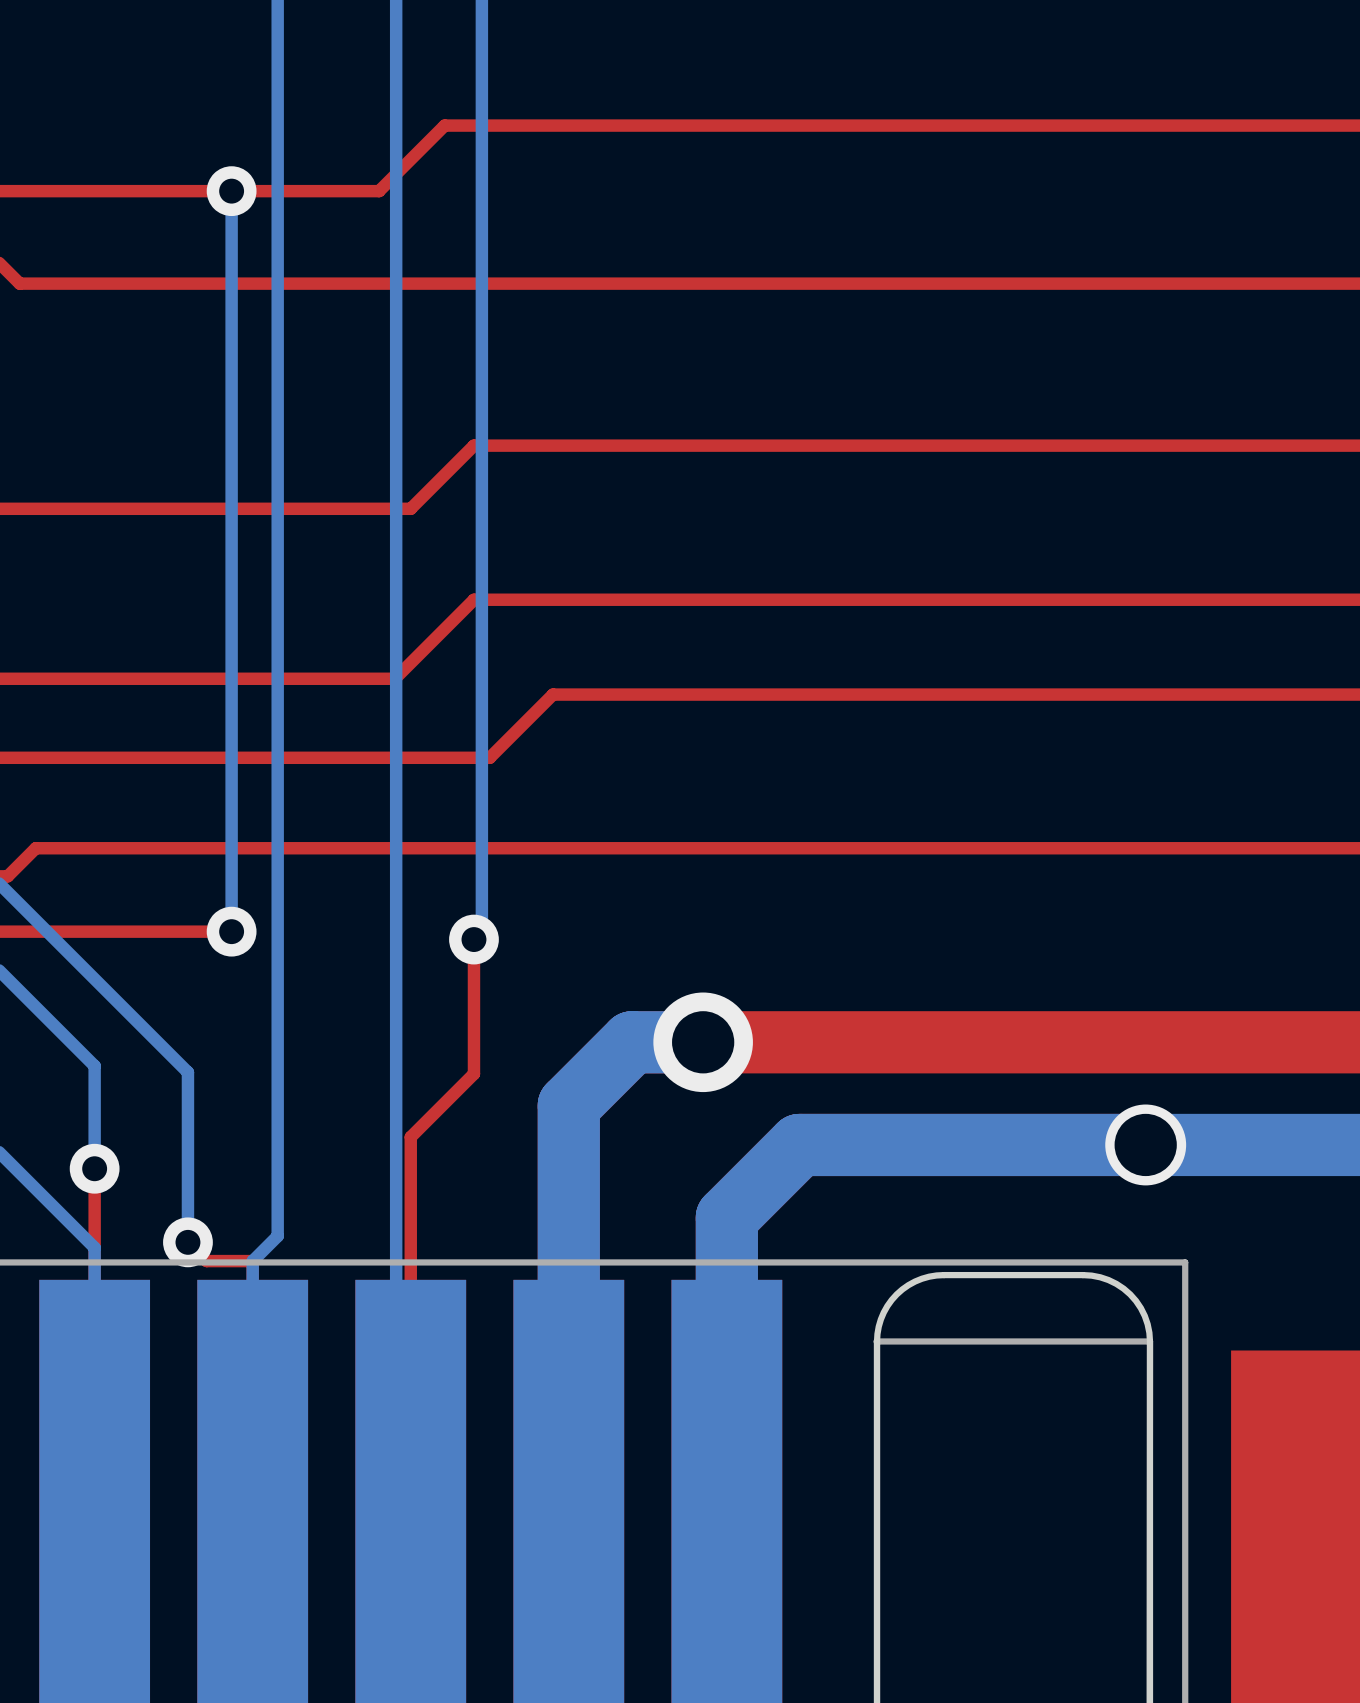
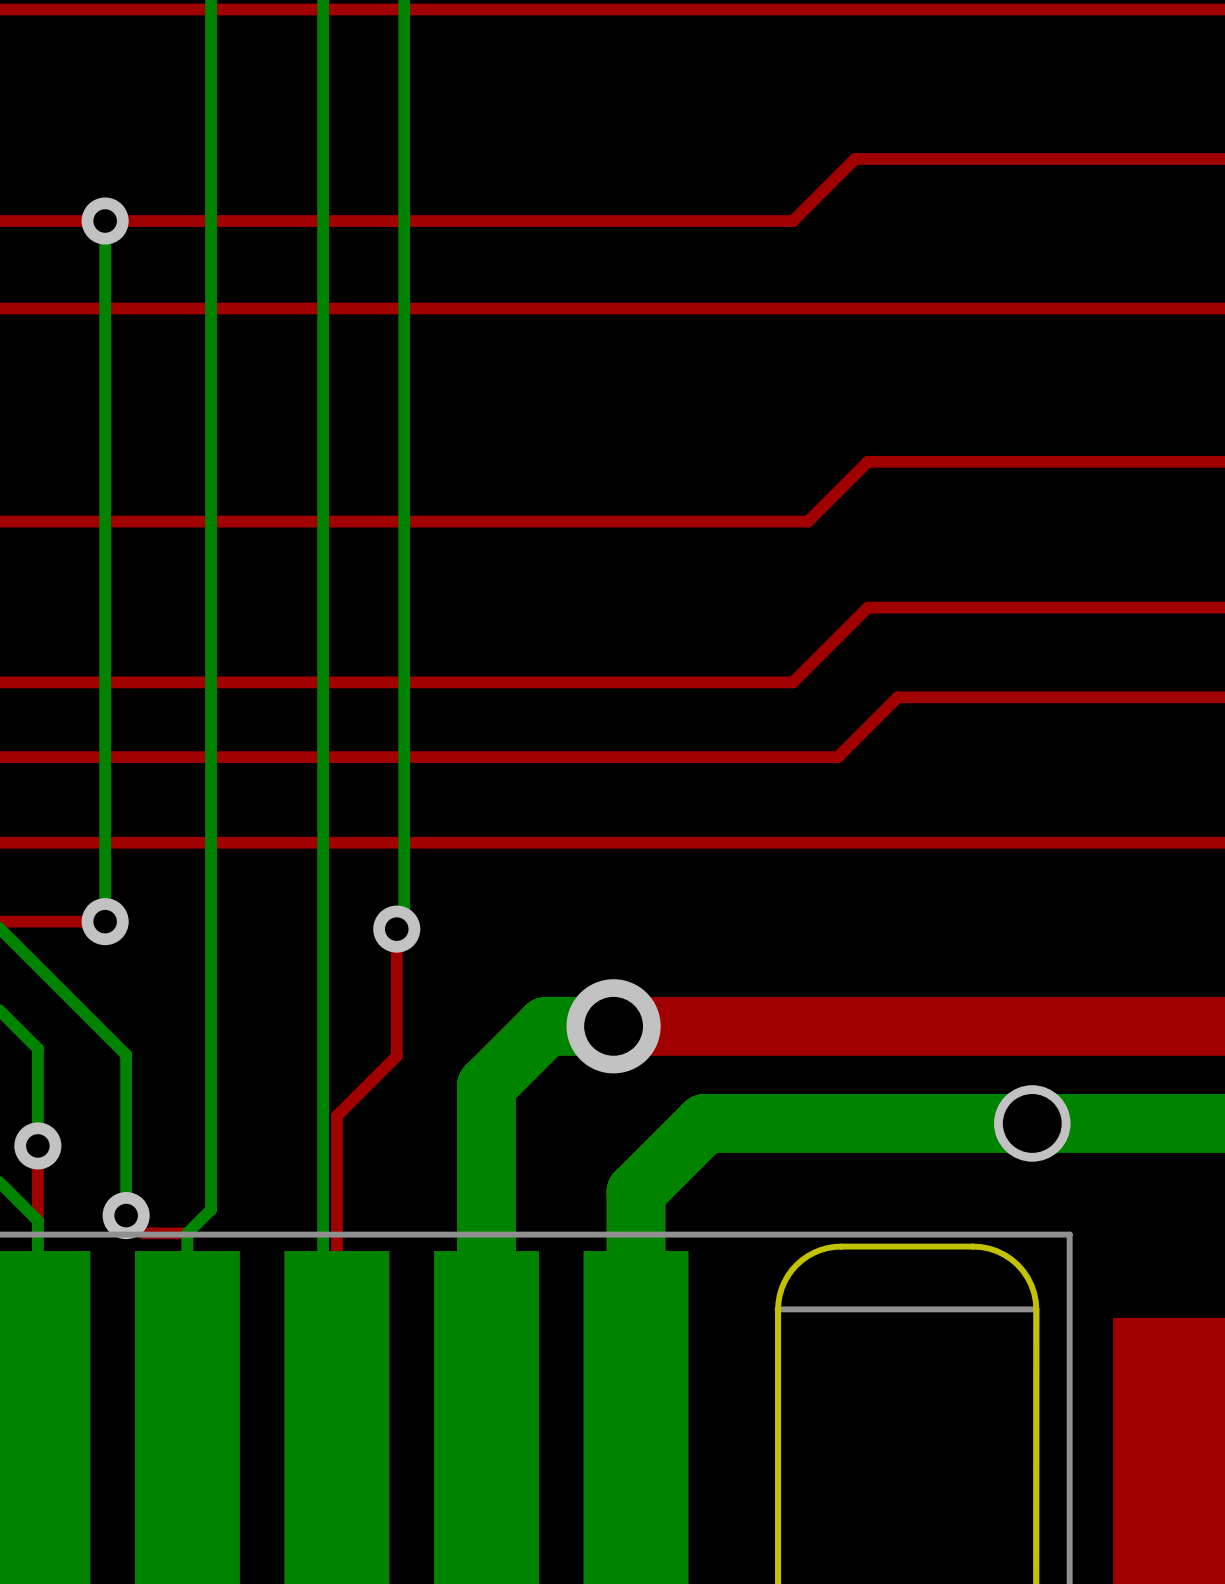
top track: (958, 125) (444, 125) (379, 191) -> (855, 158) (793, 221) (307, 221)
bottom track: (231, 191) (231, 931) -> (105, 221) (105, 921)
via position: (231, 191) -> (105, 221)
top track: (971, 445) (473, 445) (410, 508) -> (867, 461) (808, 521) (336, 521)
top track: (971, 599) (473, 599) (394, 678) -> (867, 607) (793, 682) (321, 682)
top track: (1003, 694) (553, 694) (489, 757) -> (897, 697) (837, 757) (411, 757)
top track: (231, 931) (165, 931) -> none
via position: (231, 931) -> (105, 921)

